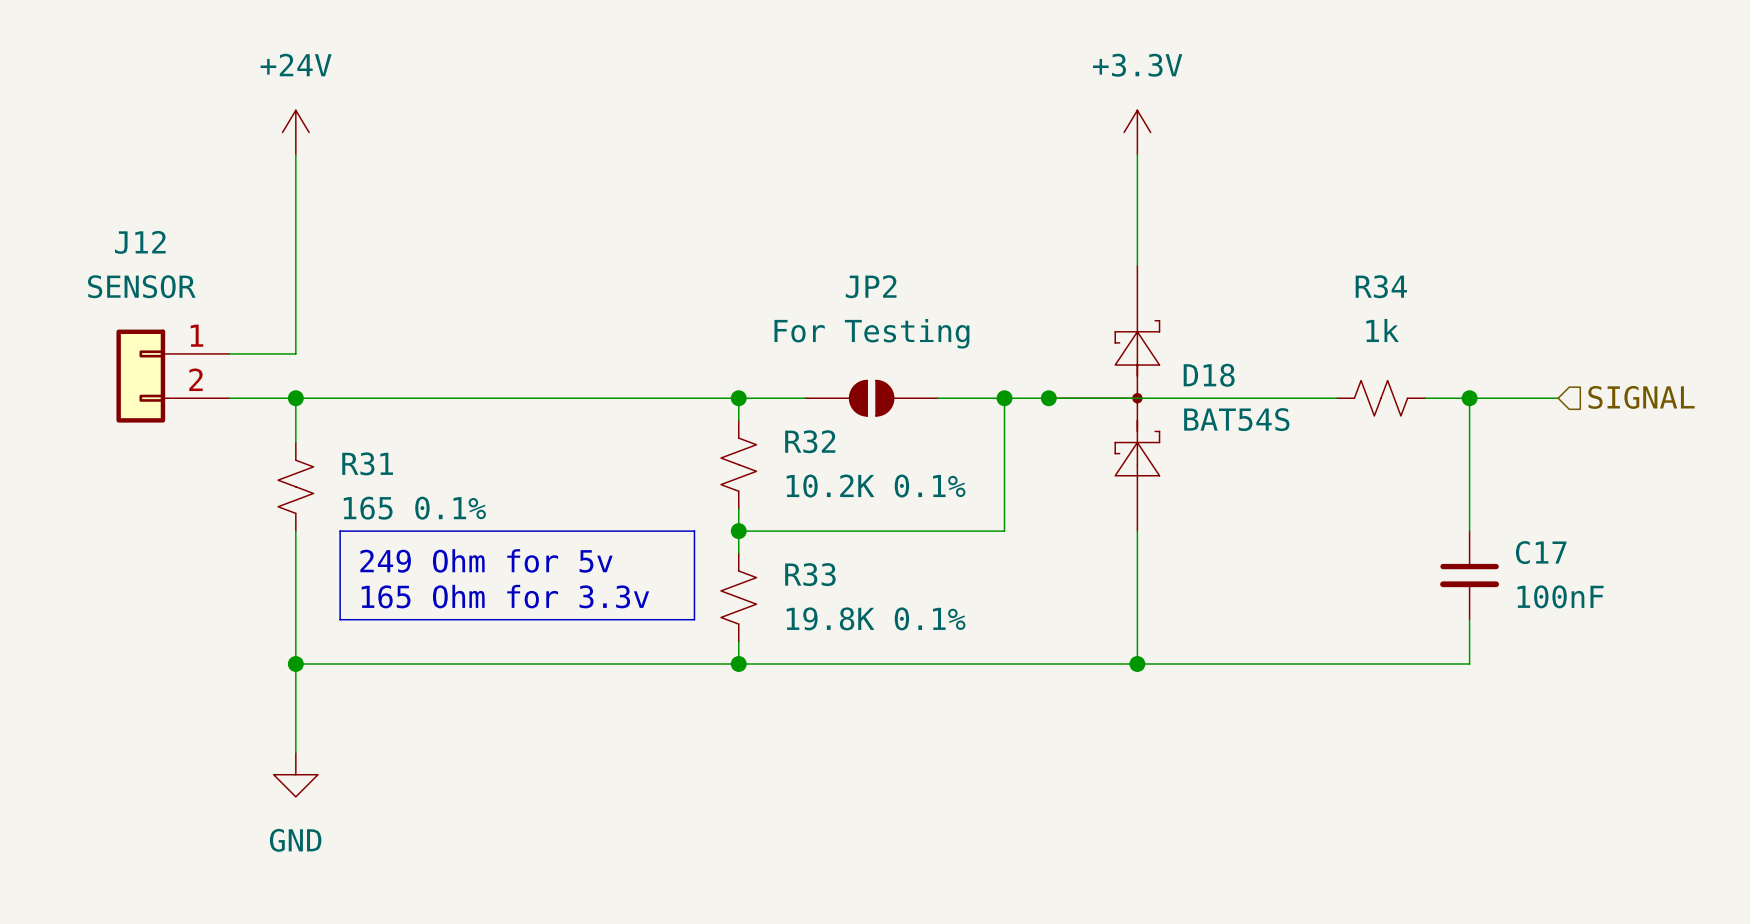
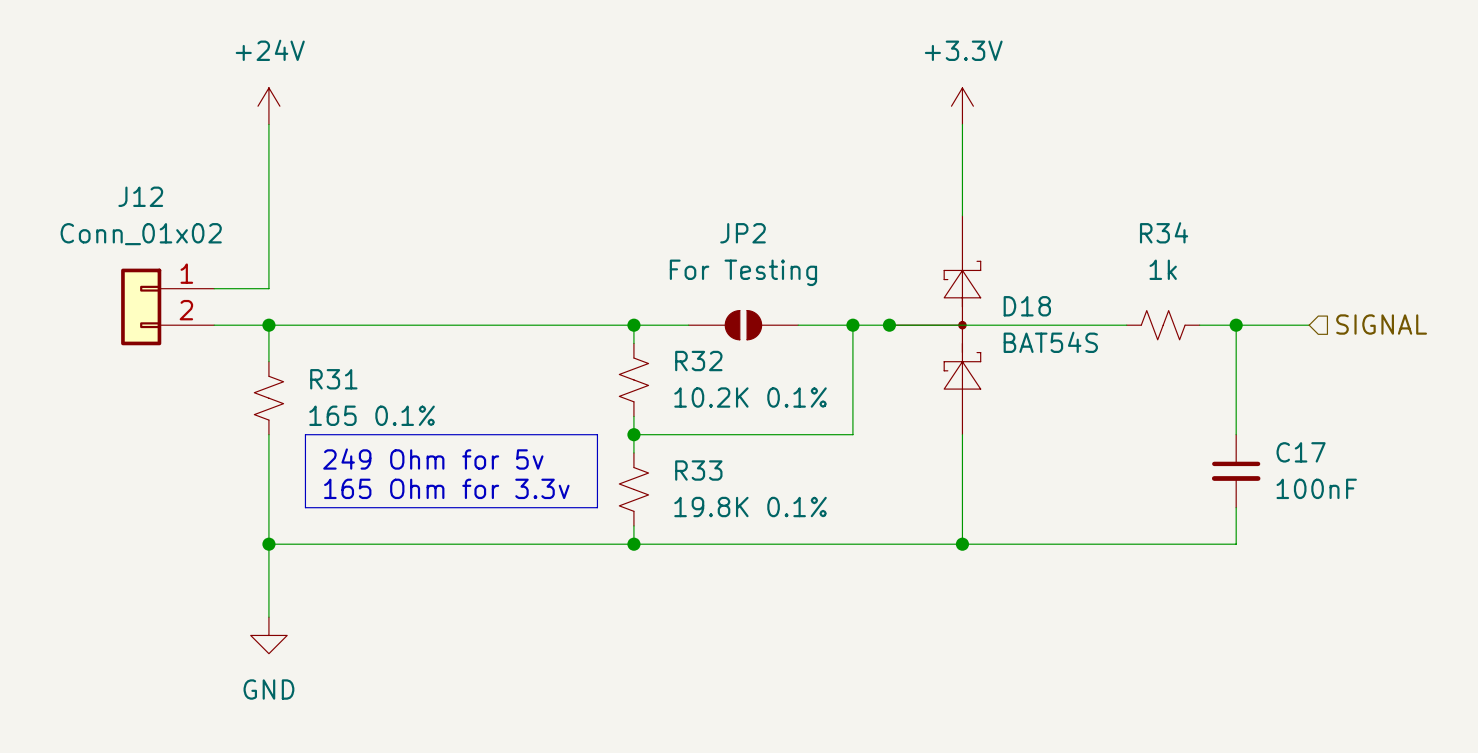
J12 value: SENSOR (141, 286) -> Conn_01x02 (141, 234)

